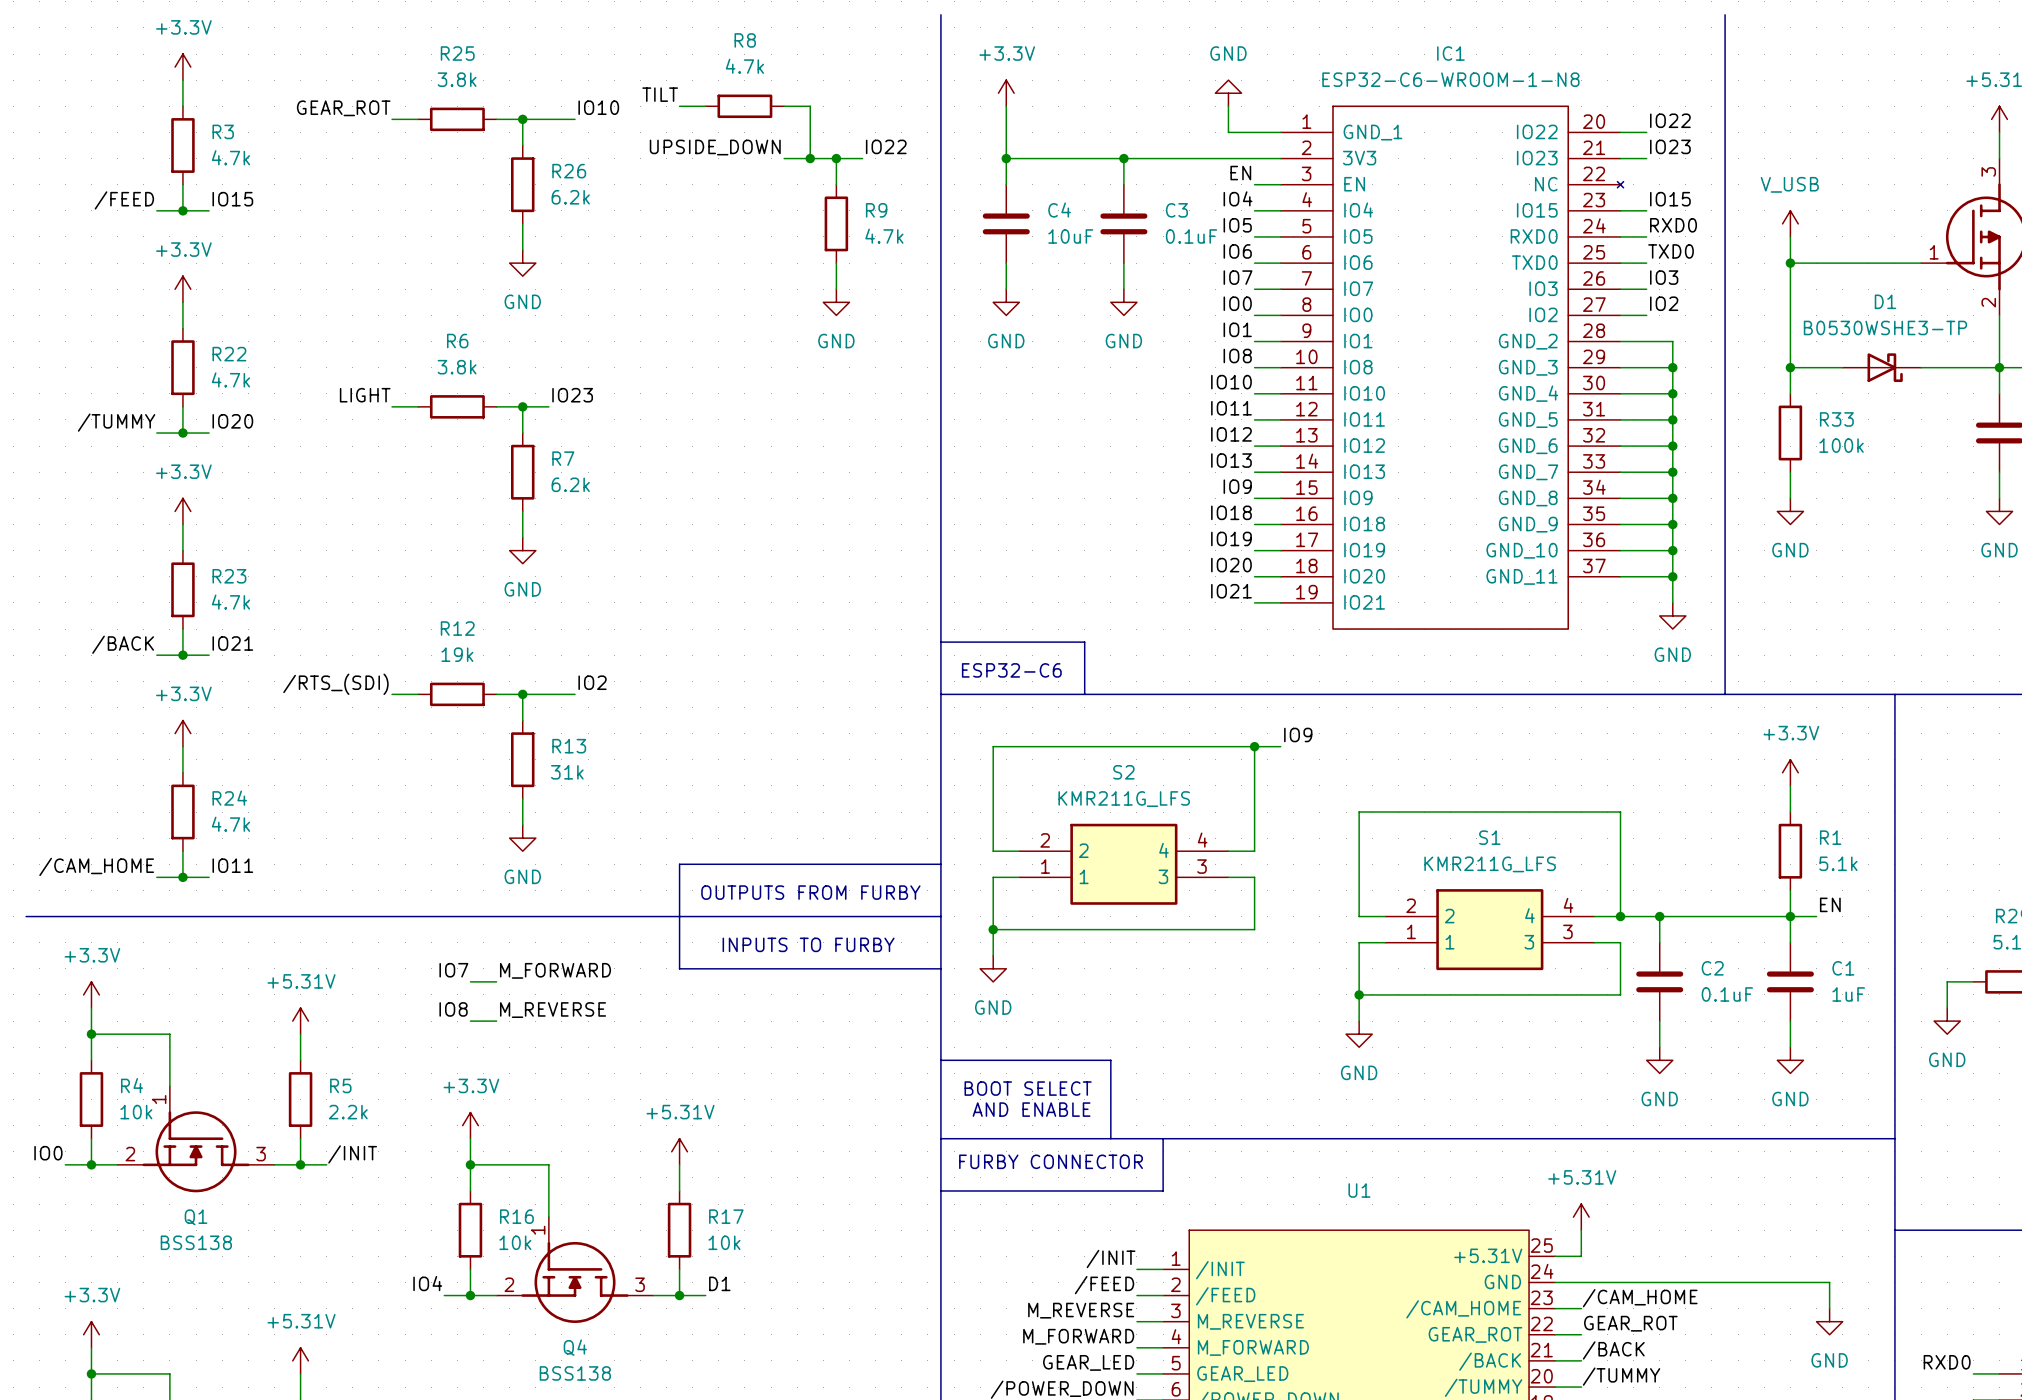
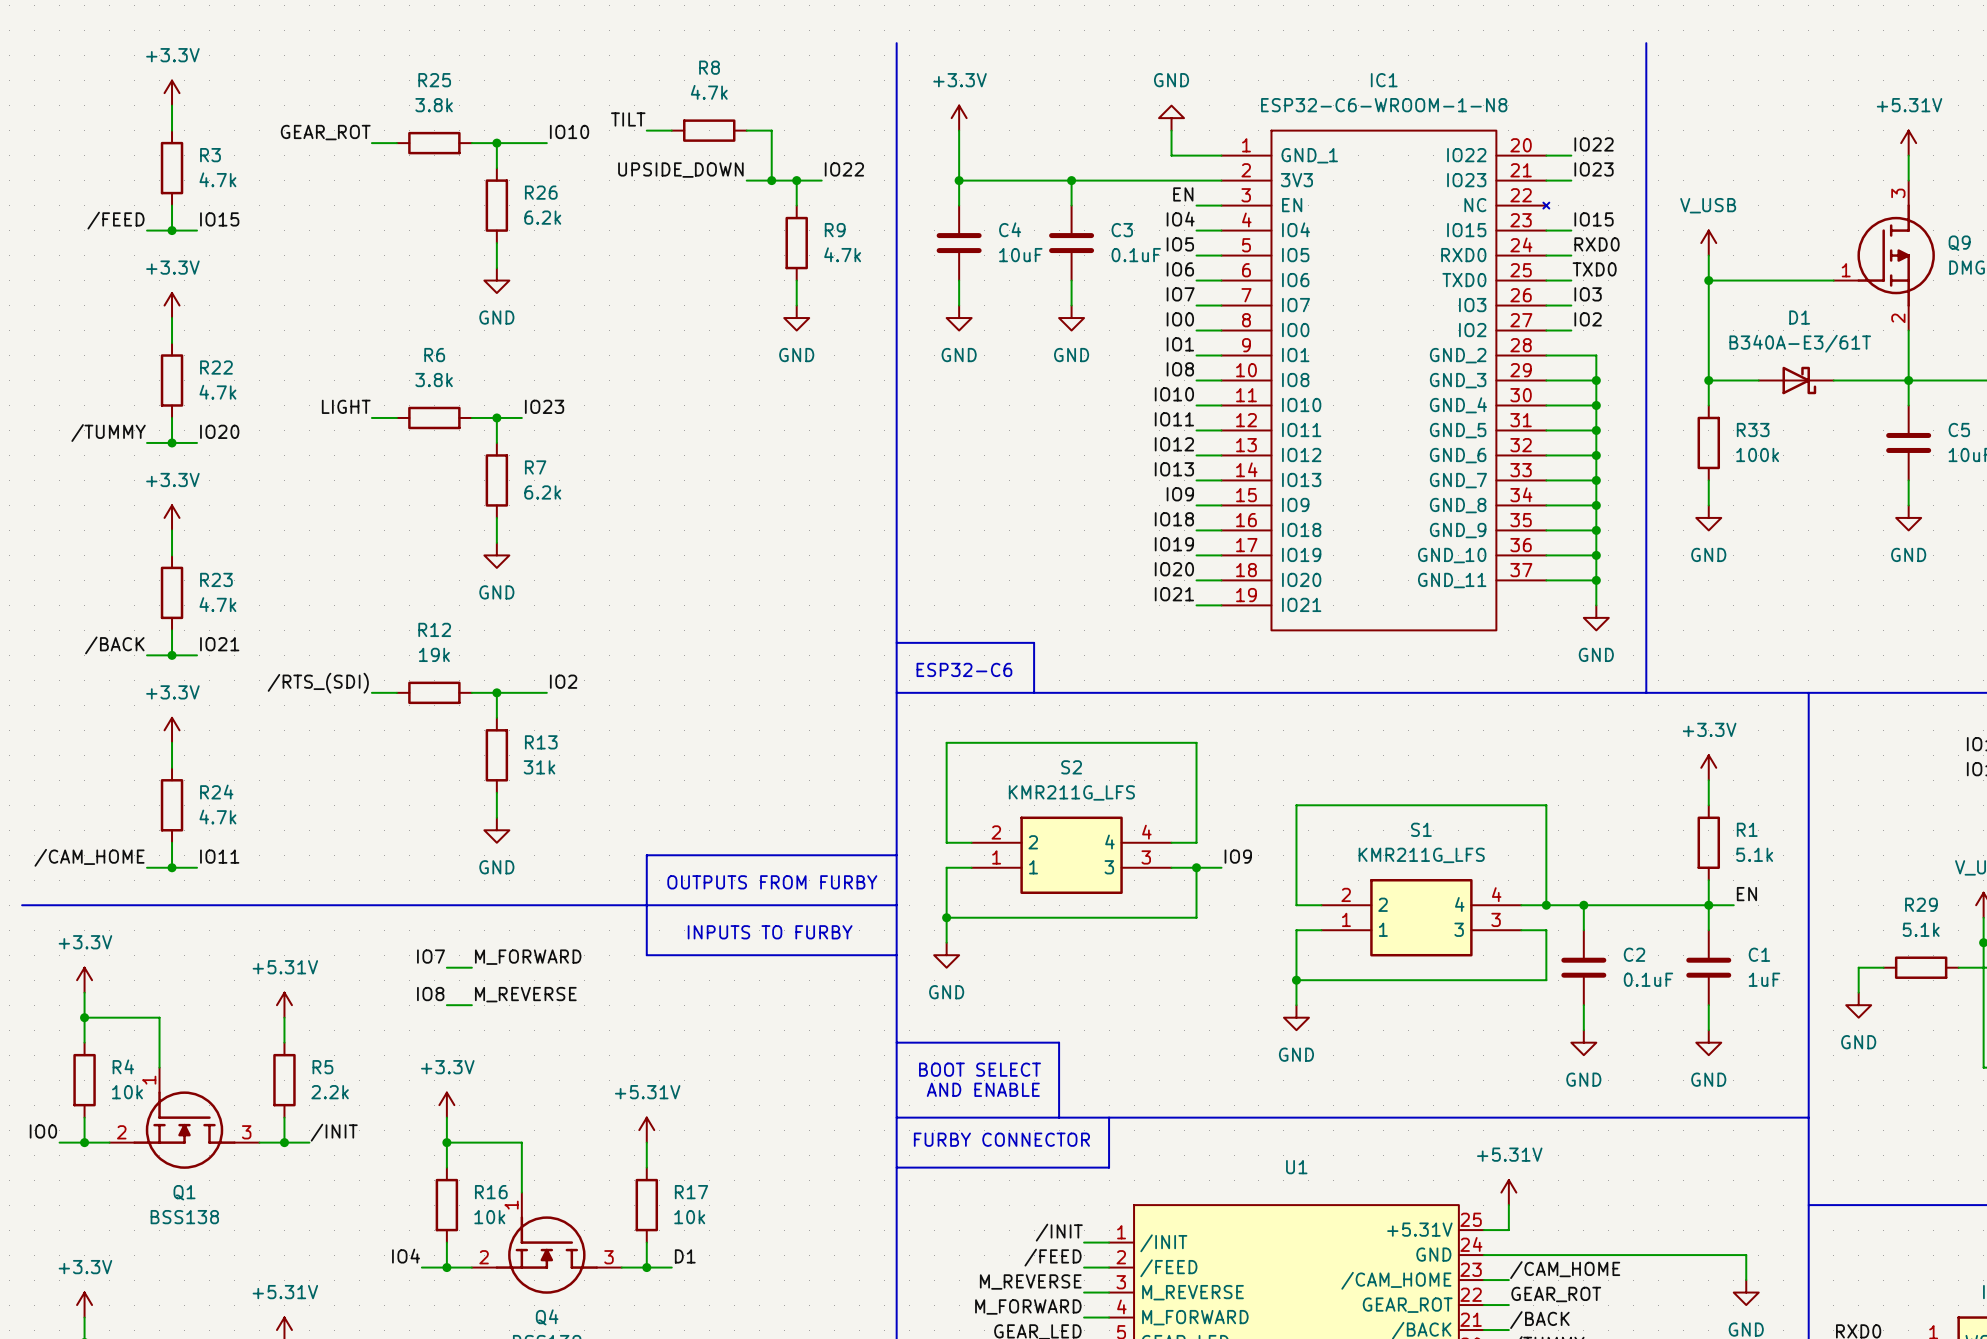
D1 value: B0530WSHE3-TP (1885, 327) -> B340A-E3/61T (1800, 343)
label position: IO9 (1298, 734) -> IO9 (1238, 856)
wire: (1254, 746) (1280, 746) -> (1196, 867) (1221, 867)
junction: (1254, 746) -> none
junction: none -> (1196, 867)

